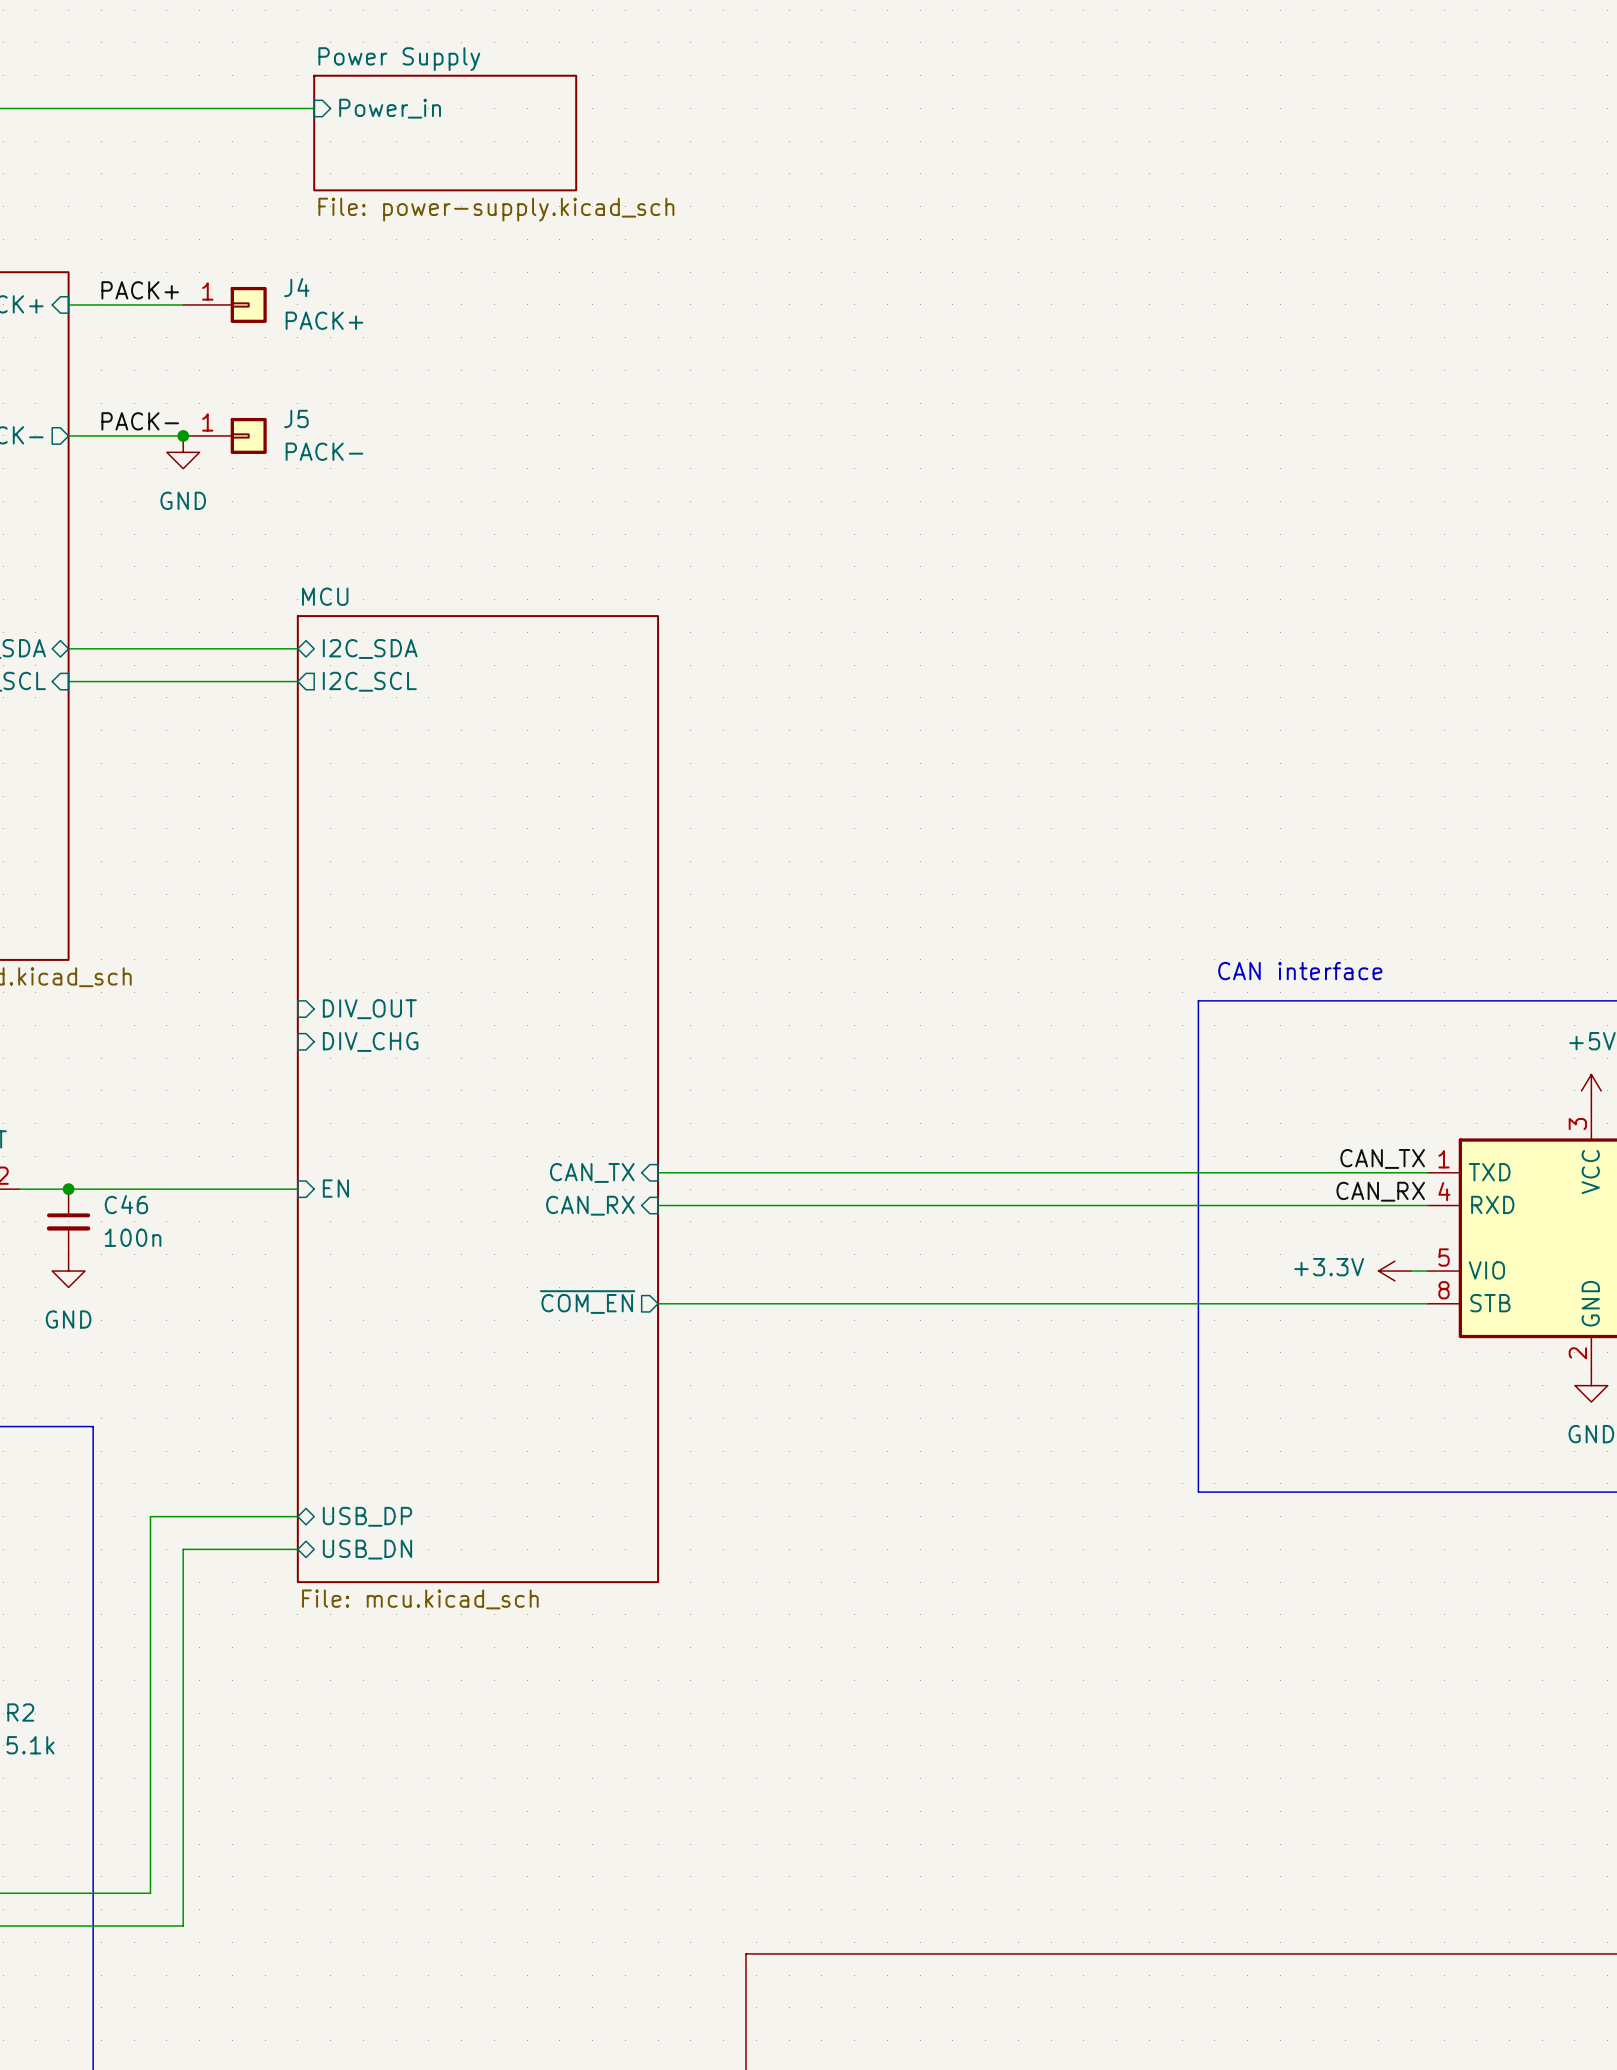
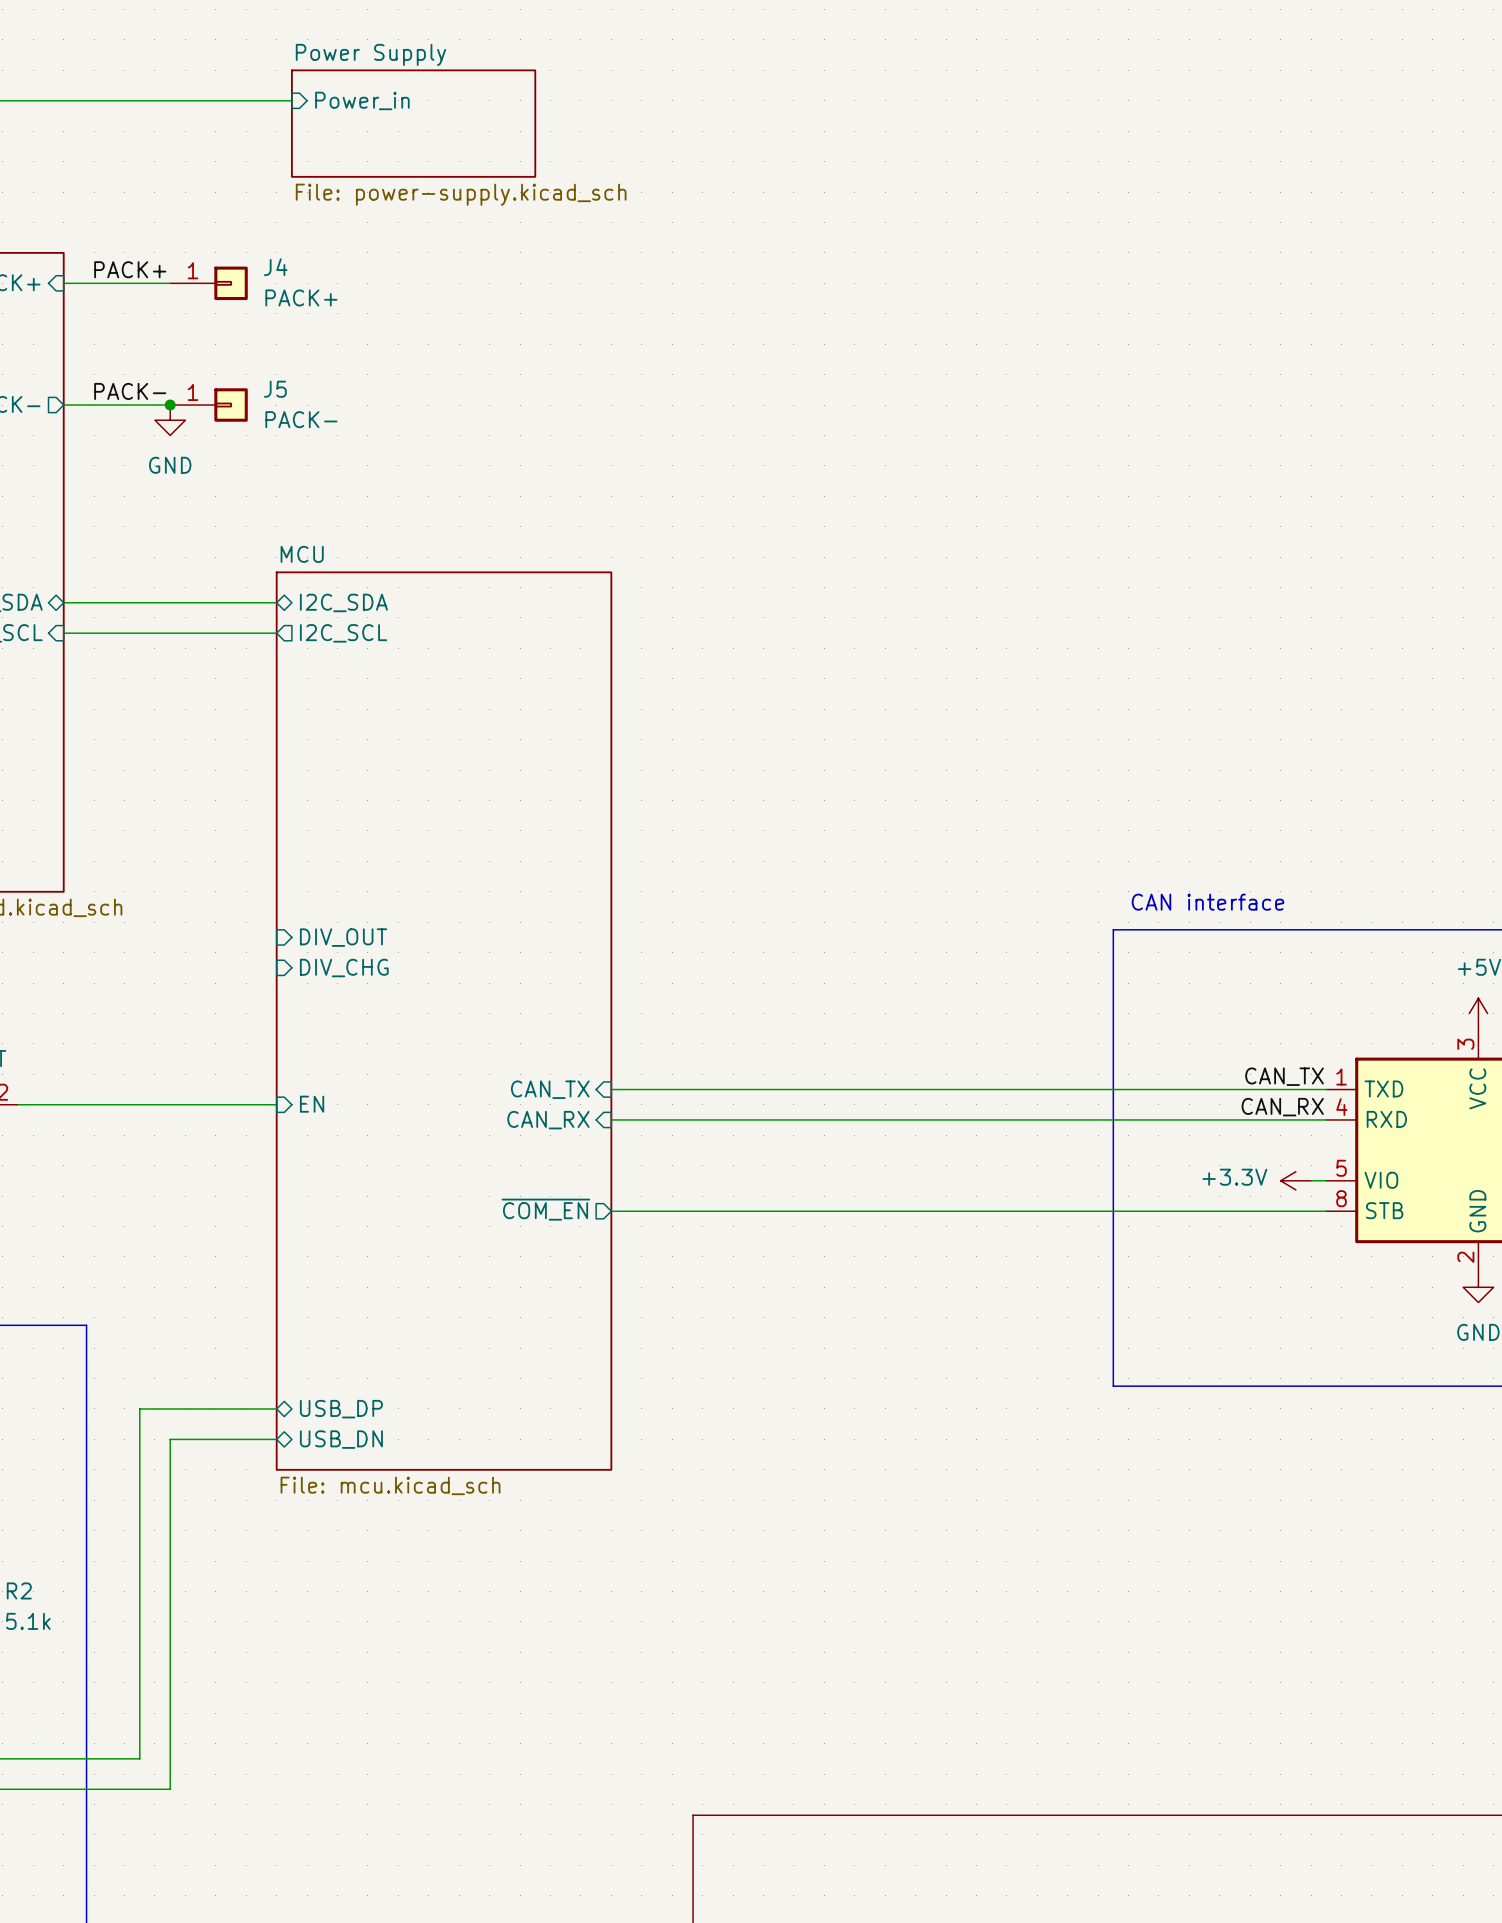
junction: (68, 1189) -> none
C46: 100n (68, 1221) -> none
power symbol: GND (68, 1271) -> none

